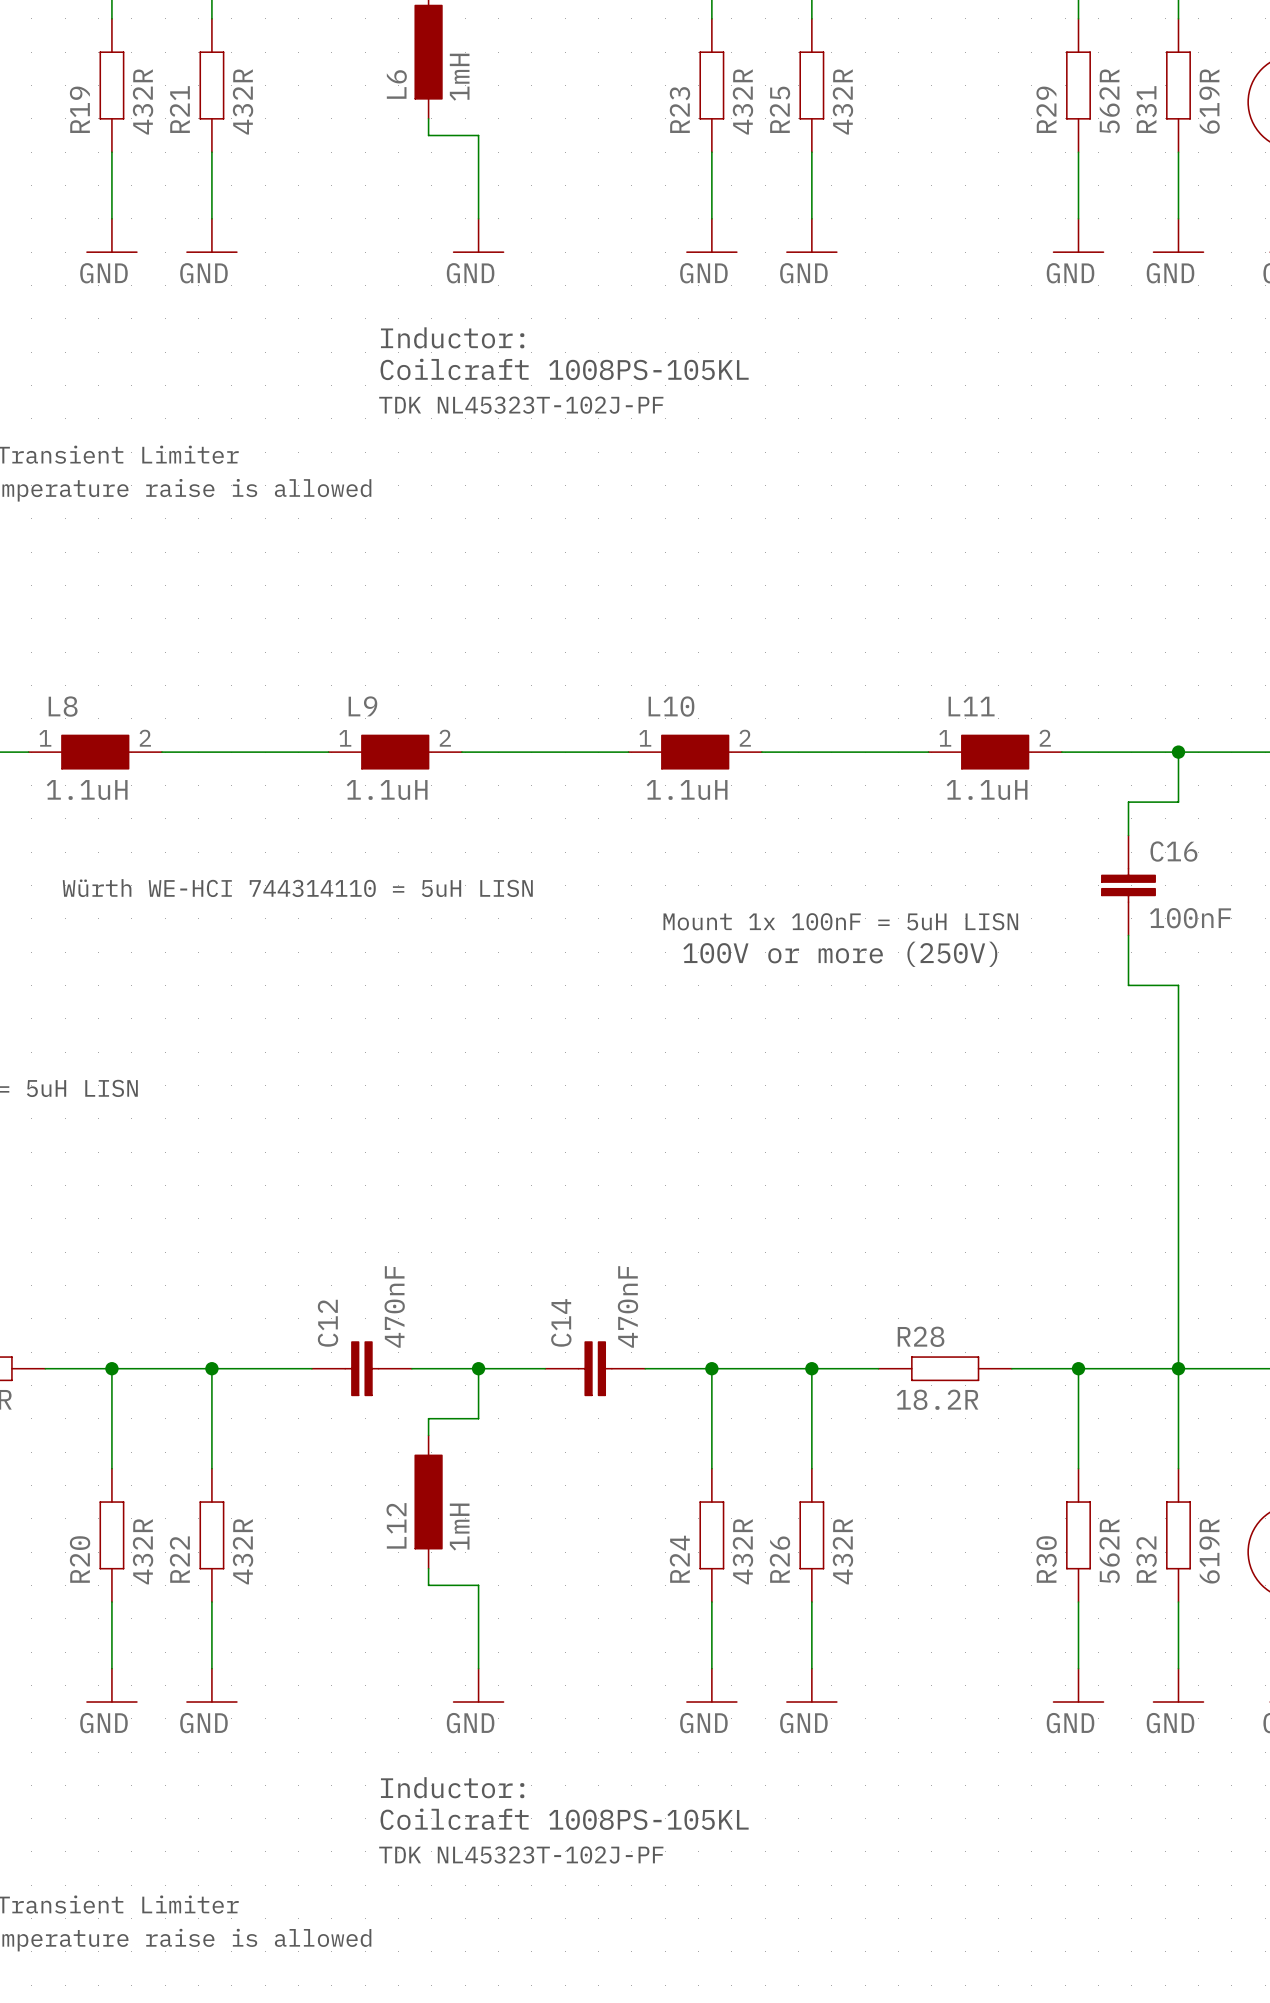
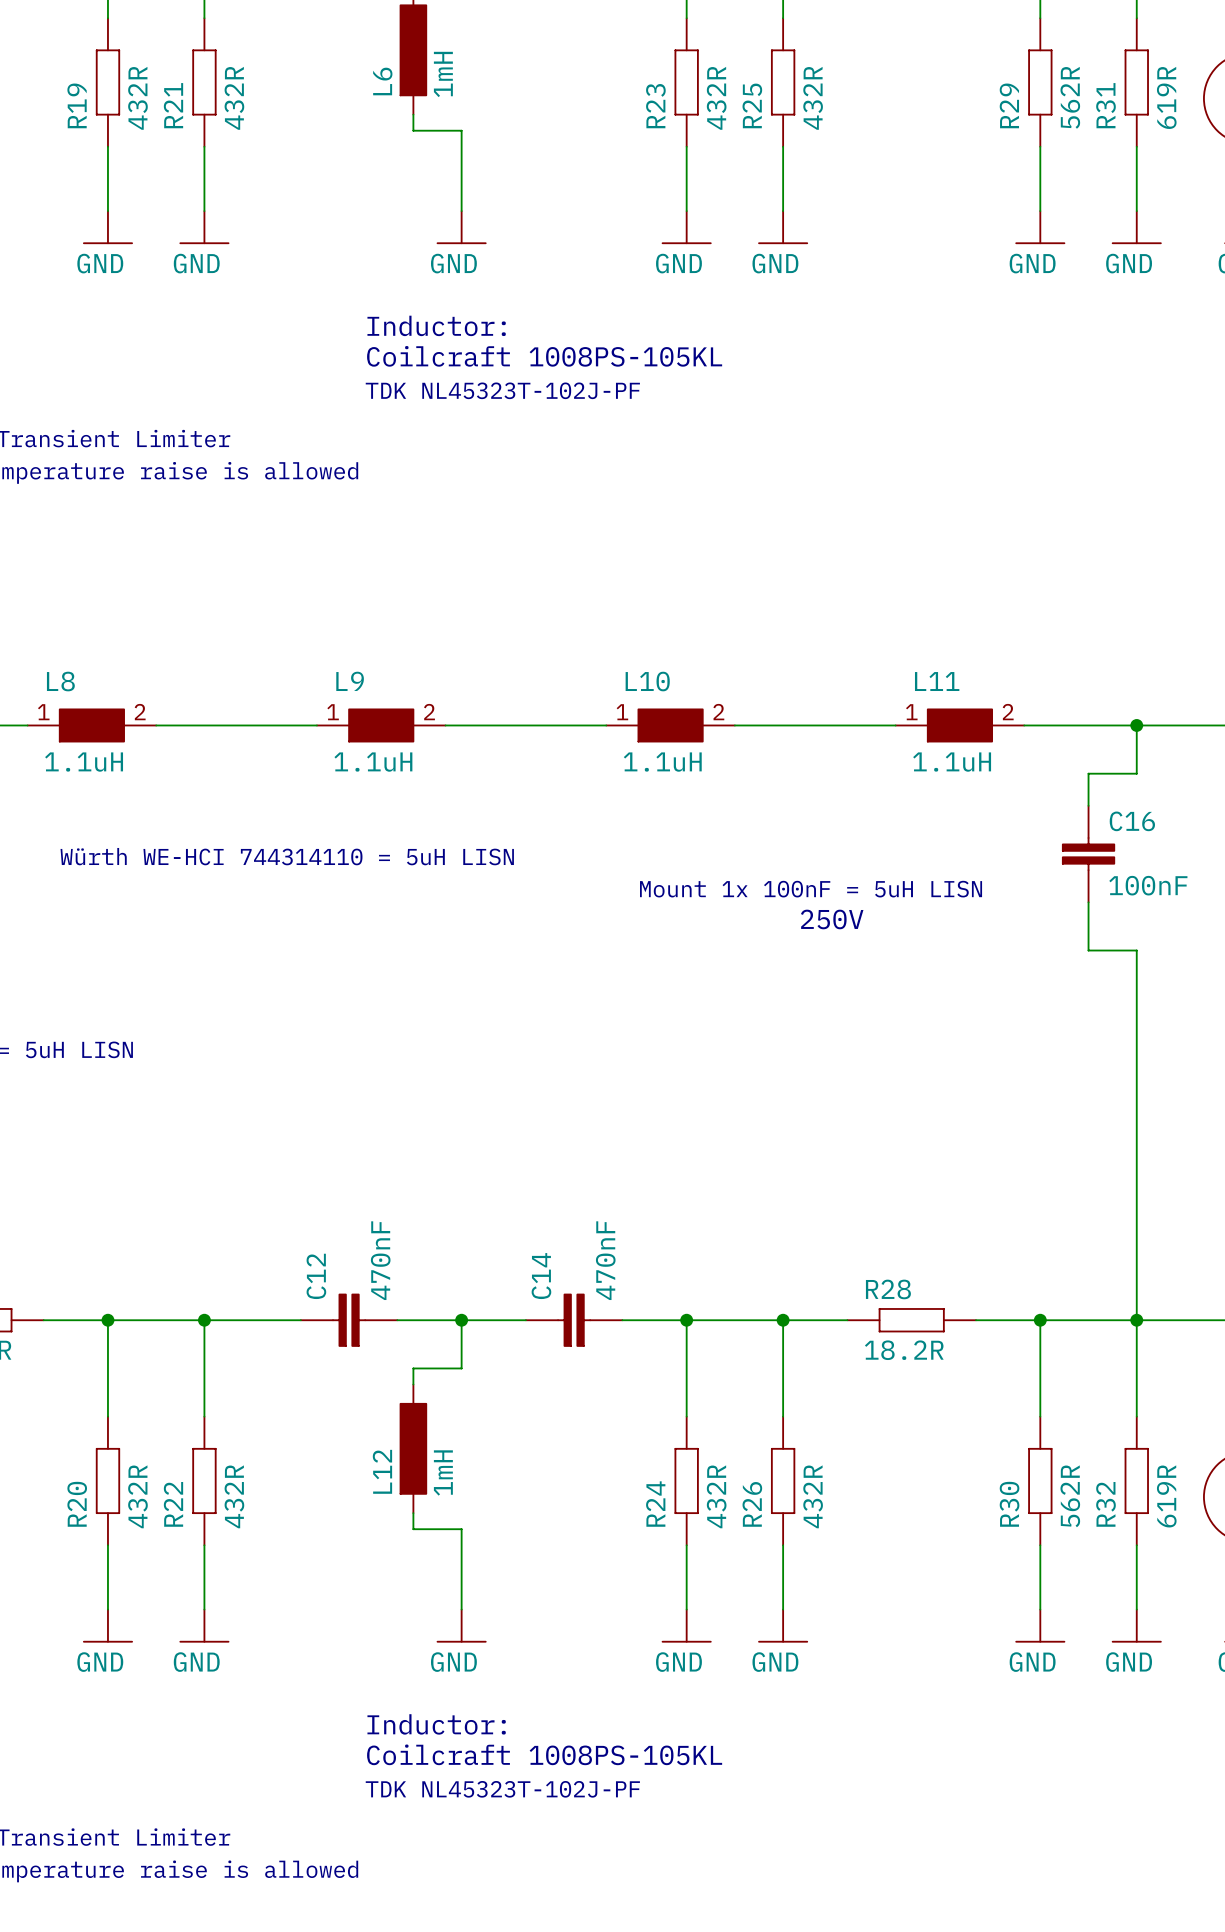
text: none -> 250V (832, 919)
text: 100V or more (250V) (840, 954) -> none

